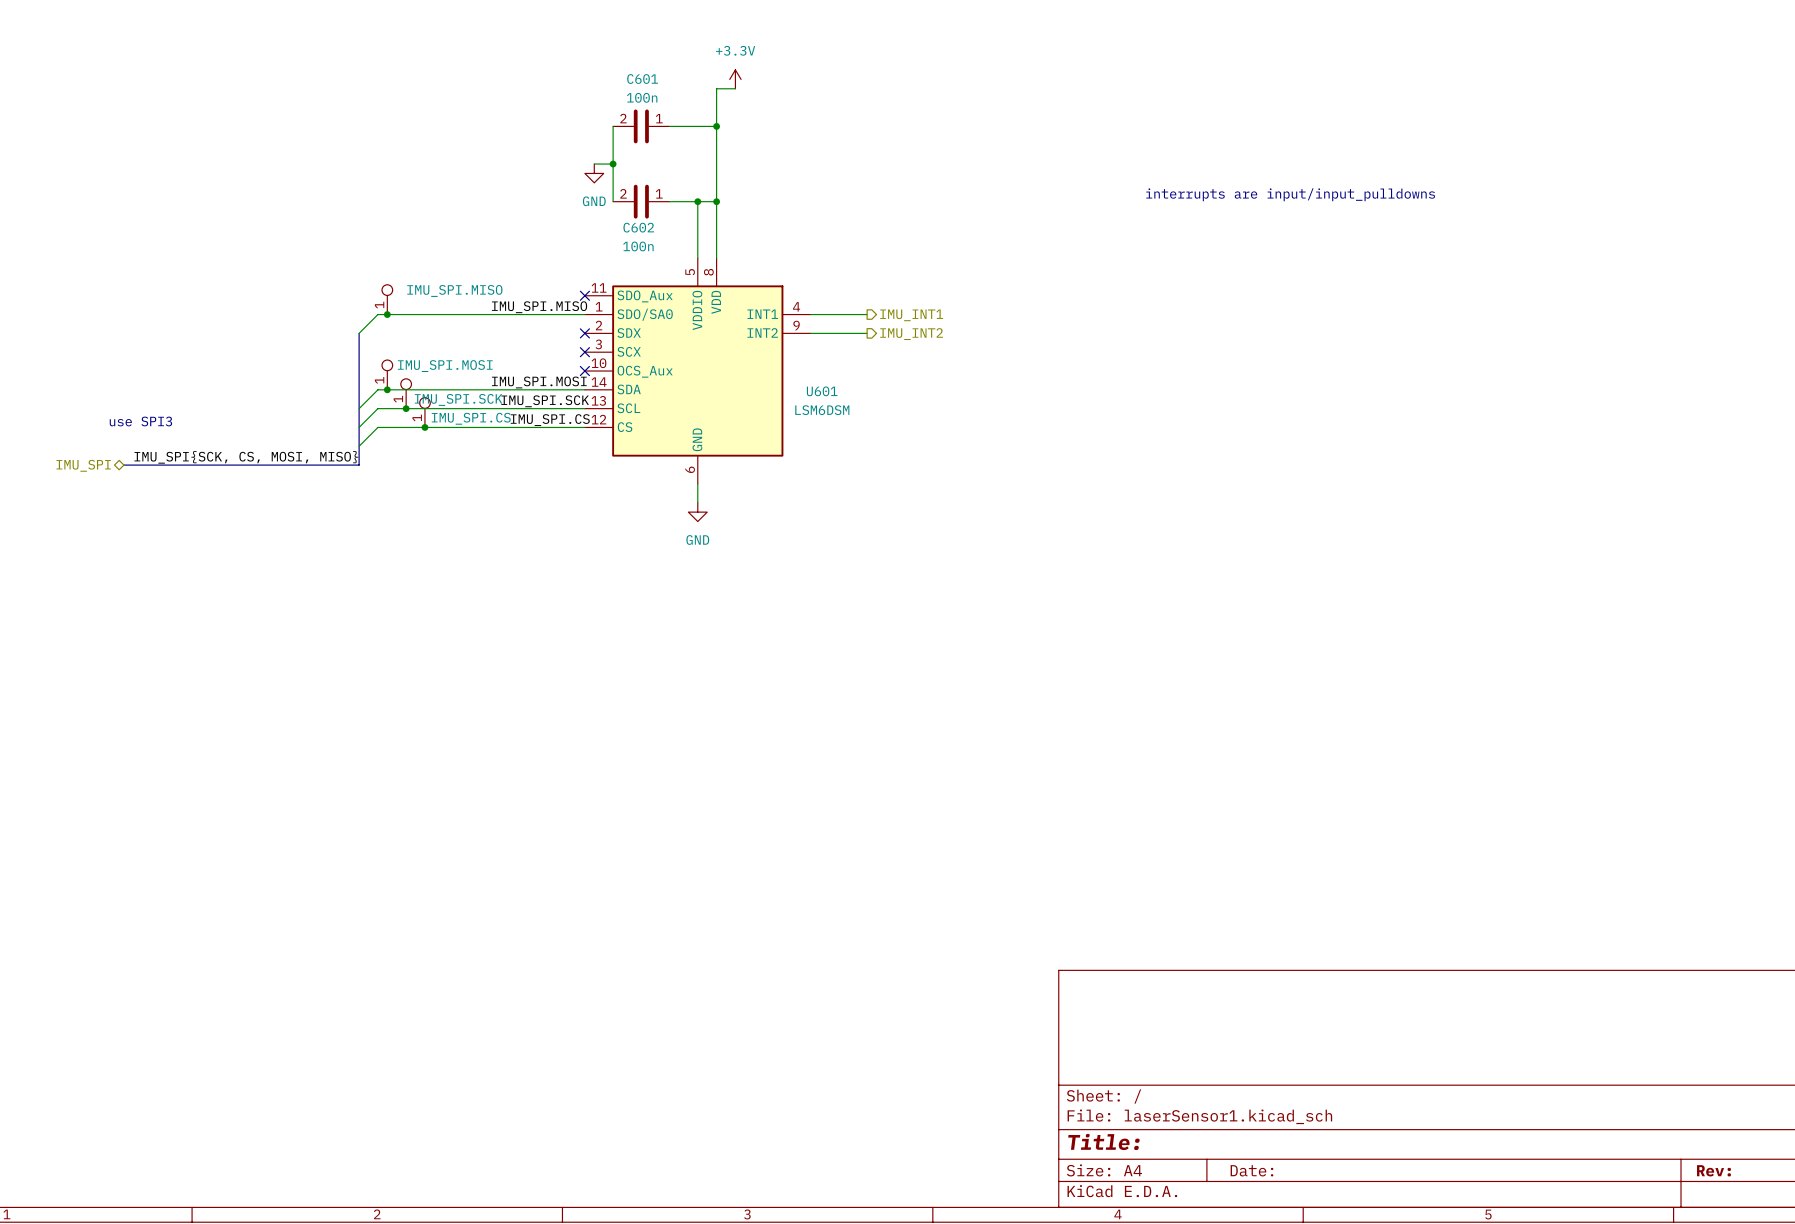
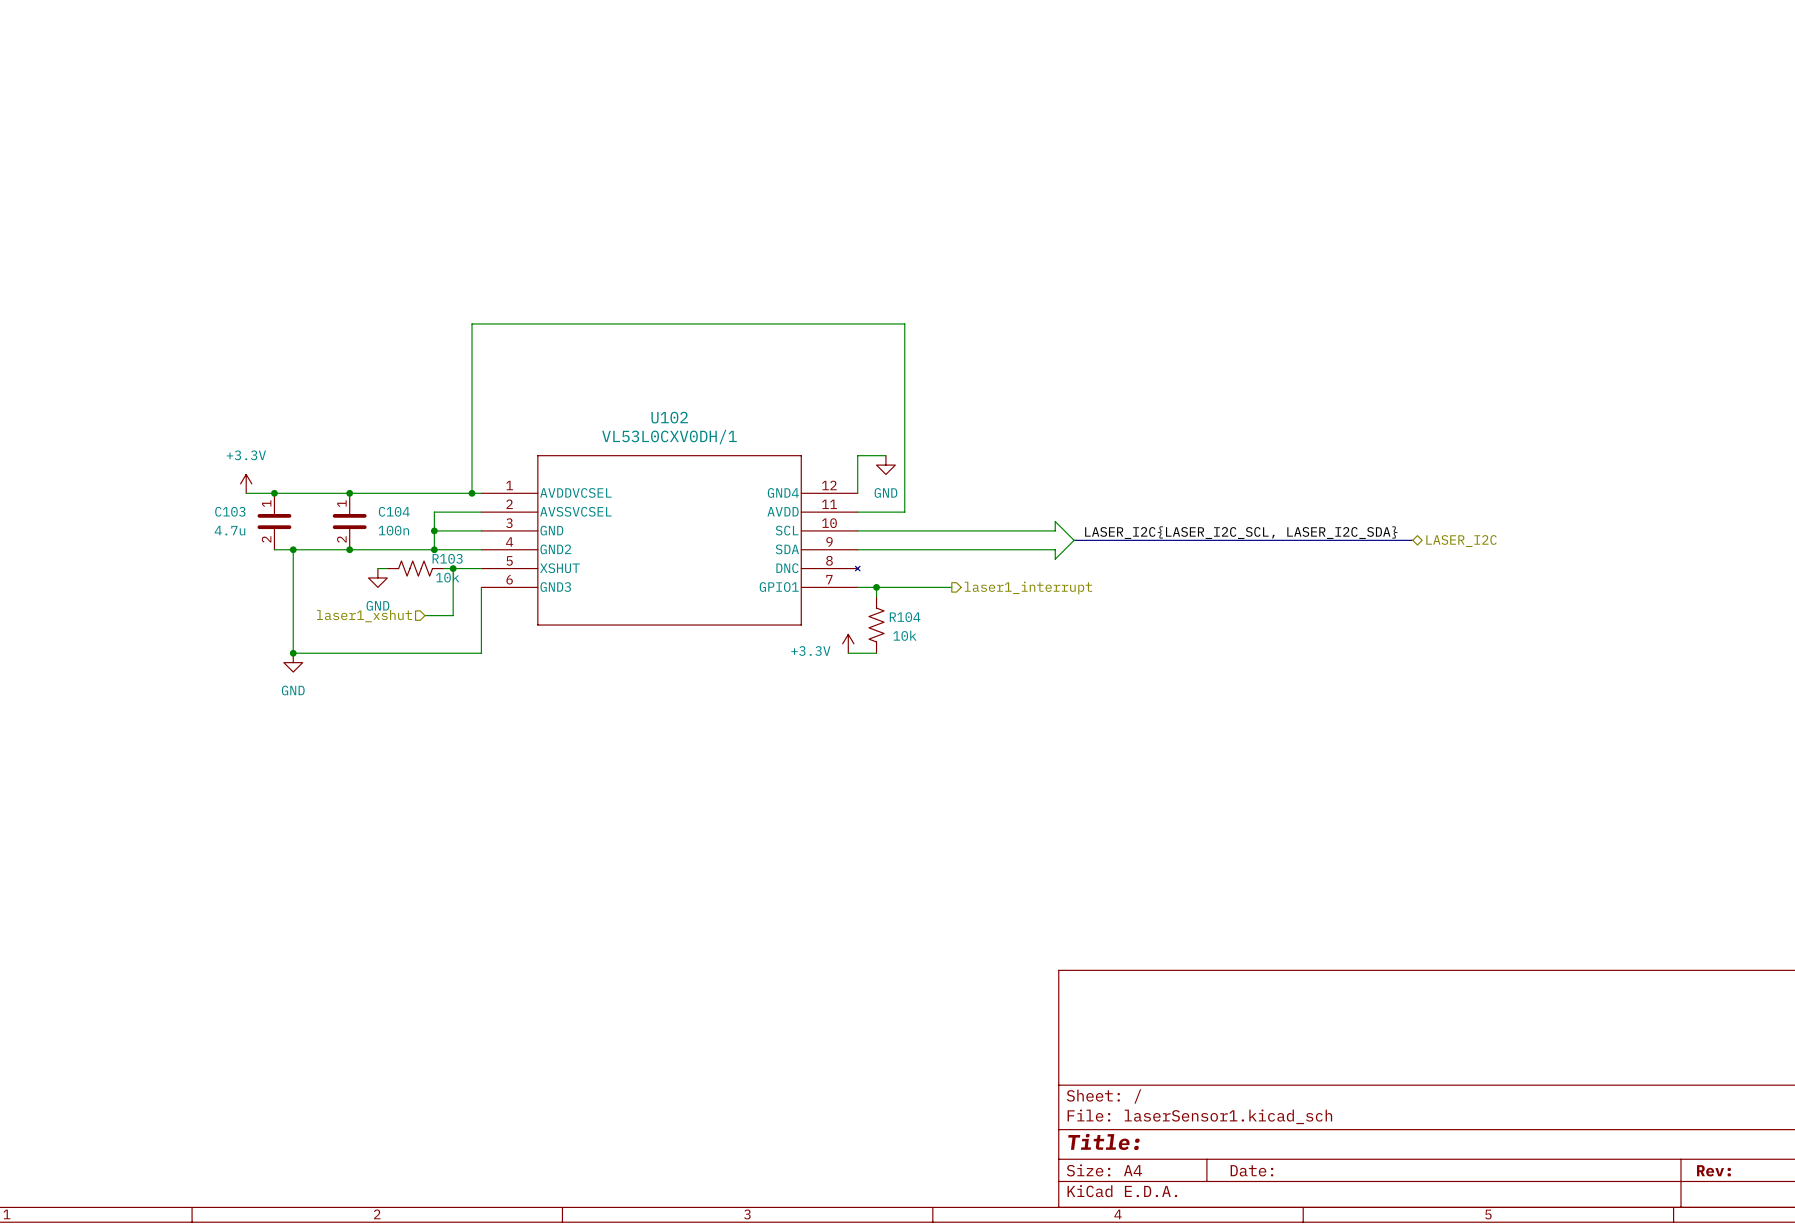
power symbol: +3.3V (735, 79) -> none
wire: (735, 88) (716, 88) (716, 258) -> none
wire: (613, 126) (613, 201) -> none
C601: 100n (641, 126) -> none
wire: (669, 126) (716, 126) -> none
junction: (716, 126) -> none
wire: (594, 164) (613, 164) -> none
junction: (613, 164) -> none
power symbol: GND (594, 173) -> none
text: interrupts are input/input_pulldowns (1290, 194) -> none
C602: 100n (641, 201) -> none
wire: (669, 201) (716, 201) -> none
wire: (697, 201) (697, 258) -> none
junction: (697, 201) -> none
junction: (716, 201) -> none
no-connect mark: (584, 295) -> none
part: IMU_SPI.MISO (387, 299) -> none
label: IMU_SPI.MISO (539, 307) -> none
junction: (387, 314) -> none
wire: (584, 314) (377, 314) (359, 333) -> none
wire: (810, 314) (867, 314) -> none
hierarchical label: IMU_INT1 (911, 315) -> none
bus: (359, 333) (359, 465) (123, 465) -> none
no-connect mark: (584, 333) -> none
wire: (810, 333) (867, 333) -> none
hierarchical label: IMU_INT2 (911, 334) -> none
no-connect mark: (584, 352) -> none
no-connect mark: (584, 371) -> none
U601: LSM6DSM (697, 371) -> none
part: IMU_SPI.MOSI (387, 374) -> none
label: IMU_SPI.MOSI (539, 382) -> none
junction: (387, 389) -> none
wire: (584, 389) (377, 389) (359, 408) -> none
part: IMU_SPI.SCK (406, 393) -> none
label: IMU_SPI.SCK (545, 401) -> none
junction: (406, 408) -> none
wire: (584, 408) (377, 408) (359, 427) -> none
part: IMU_SPI.CS (424, 412) -> none
label: IMU_SPI.CS (550, 420) -> none
text: use SPI3 (140, 421) -> none
junction: (424, 427) -> none
wire: (584, 427) (377, 427) (359, 446) -> none
wire: none -> (885, 455) (857, 455) (857, 493)
label: IMU_SPI{SCK, CS, MOSI, MISO} (246, 457) -> none
hierarchical label: IMU_SPI (83, 465) -> none
power symbol: none -> GND (885, 465)
power symbol: none -> +3.3V (246, 483)
wire: (697, 483) (697, 502) -> none
wire: none -> (246, 493) (481, 493)
junction: none -> (274, 493)
junction: none -> (349, 493)
wire: none -> (472, 493) (472, 323) (904, 323) (904, 512) (857, 512)
junction: none -> (472, 493)
wire: none -> (481, 512) (434, 512) (434, 549)
power symbol: GND (697, 512) -> none
C103: none -> 4.7u (274, 521)
C104: none -> 100n (349, 521)
wire: none -> (434, 530) (481, 530)
junction: none -> (434, 530)
wire: none -> (857, 530) (1055, 530) (1055, 521) (1074, 540) (1055, 559) (1055, 549) (857, 549)
label: none -> LASER_I2C{LASER_I2C_SCL, LASER_I2C_SDA} (1241, 532)
U102: none -> VL53L0CXV0DH/1 (670, 540)
bus: none -> (1074, 540) (1412, 540)
hierarchical label: none -> LASER_I2C (1461, 541)
wire: none -> (274, 549) (481, 549)
wire: none -> (293, 549) (293, 653) (481, 653) (481, 587)
junction: none -> (293, 549)
junction: none -> (349, 549)
junction: none -> (434, 549)
wire: none -> (377, 568) (387, 568)
R103: none -> 10k (415, 568)
wire: none -> (443, 568) (481, 568)
wire: none -> (453, 568) (453, 615) (424, 615)
junction: none -> (453, 568)
power symbol: none -> GND (377, 577)
wire: none -> (857, 587) (951, 587)
wire: none -> (876, 587) (876, 596)
junction: none -> (876, 587)
hierarchical label: none -> laser1_interrupt (1028, 588)
hierarchical label: none -> laser1_xshut (364, 616)
R104: none -> 10k (876, 625)
power symbol: none -> +3.3V (848, 643)
junction: none -> (293, 653)
wire: none -> (848, 653) (876, 653)
power symbol: none -> GND (293, 662)

